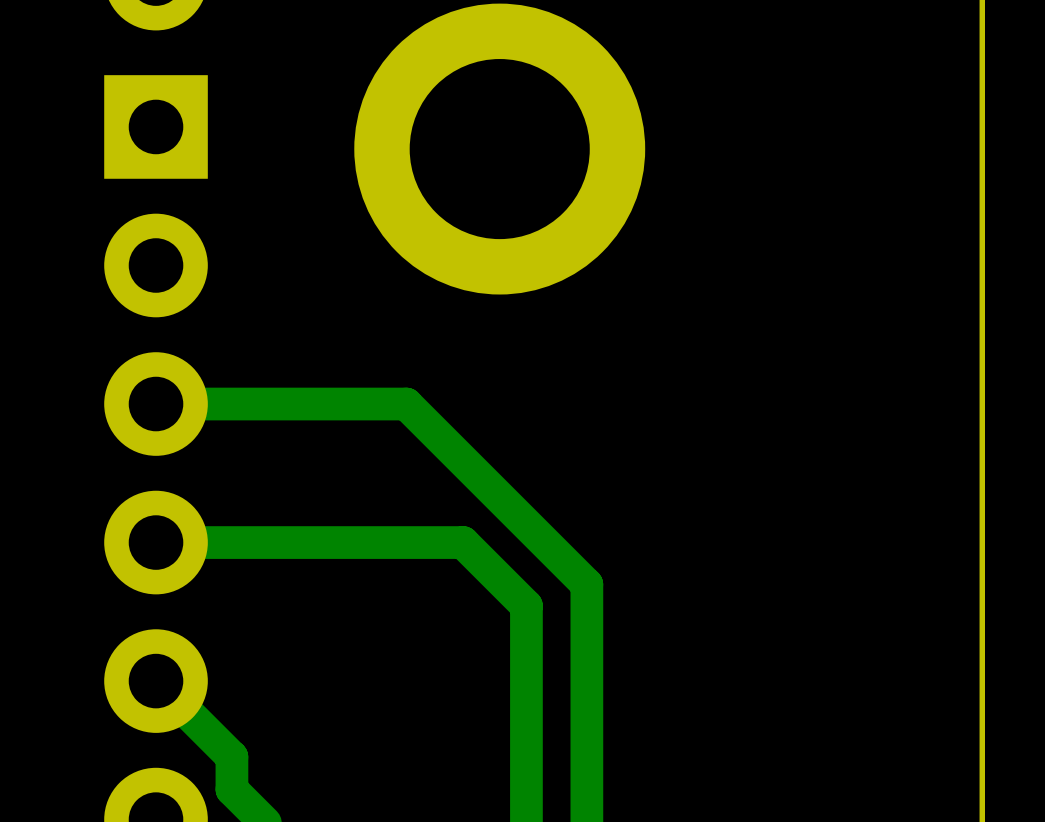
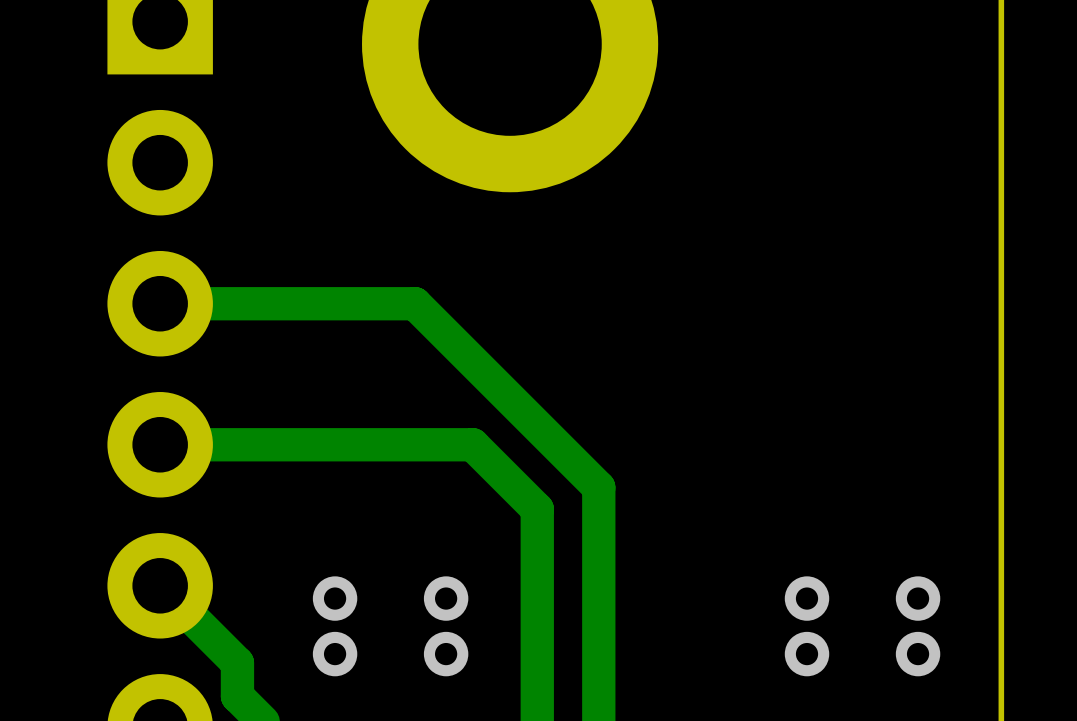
via: none -> (335, 598)
via: none -> (446, 598)
via: none -> (807, 598)
via: none -> (918, 598)
via: none -> (335, 654)
via: none -> (446, 654)
via: none -> (807, 654)
via: none -> (918, 654)

